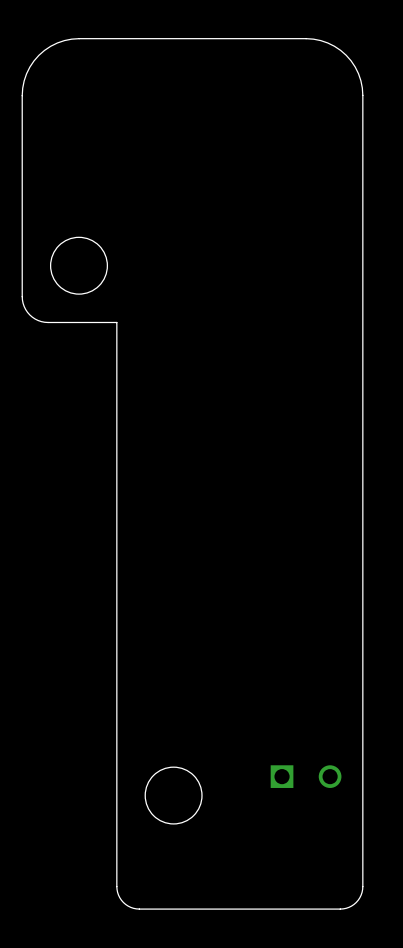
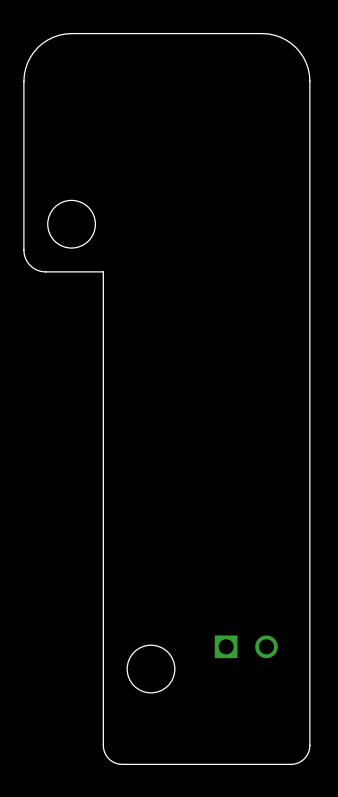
part: none -> (246, 646)
part: (306, 776) -> none

